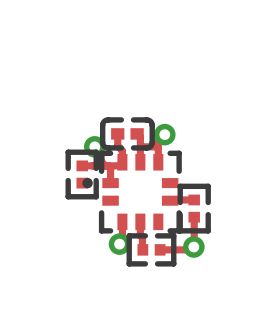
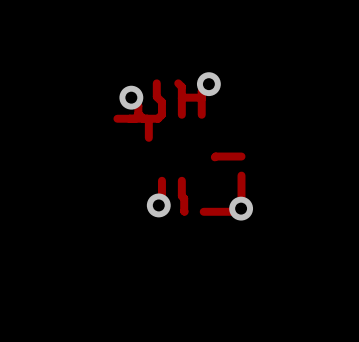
part: (127, 133) -> none
part: (82, 174) -> none
part: (132, 192) -> none
part: (194, 208) -> none
part: (151, 249) -> none

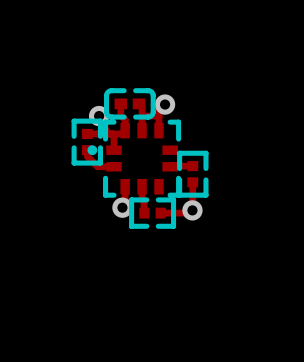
part: none -> (129, 103)
part: none -> (87, 142)
track: none -> (87, 150) (87, 156) (97, 166) (114, 166)
part: none -> (134, 158)
part: none -> (192, 174)
part: none -> (152, 213)

